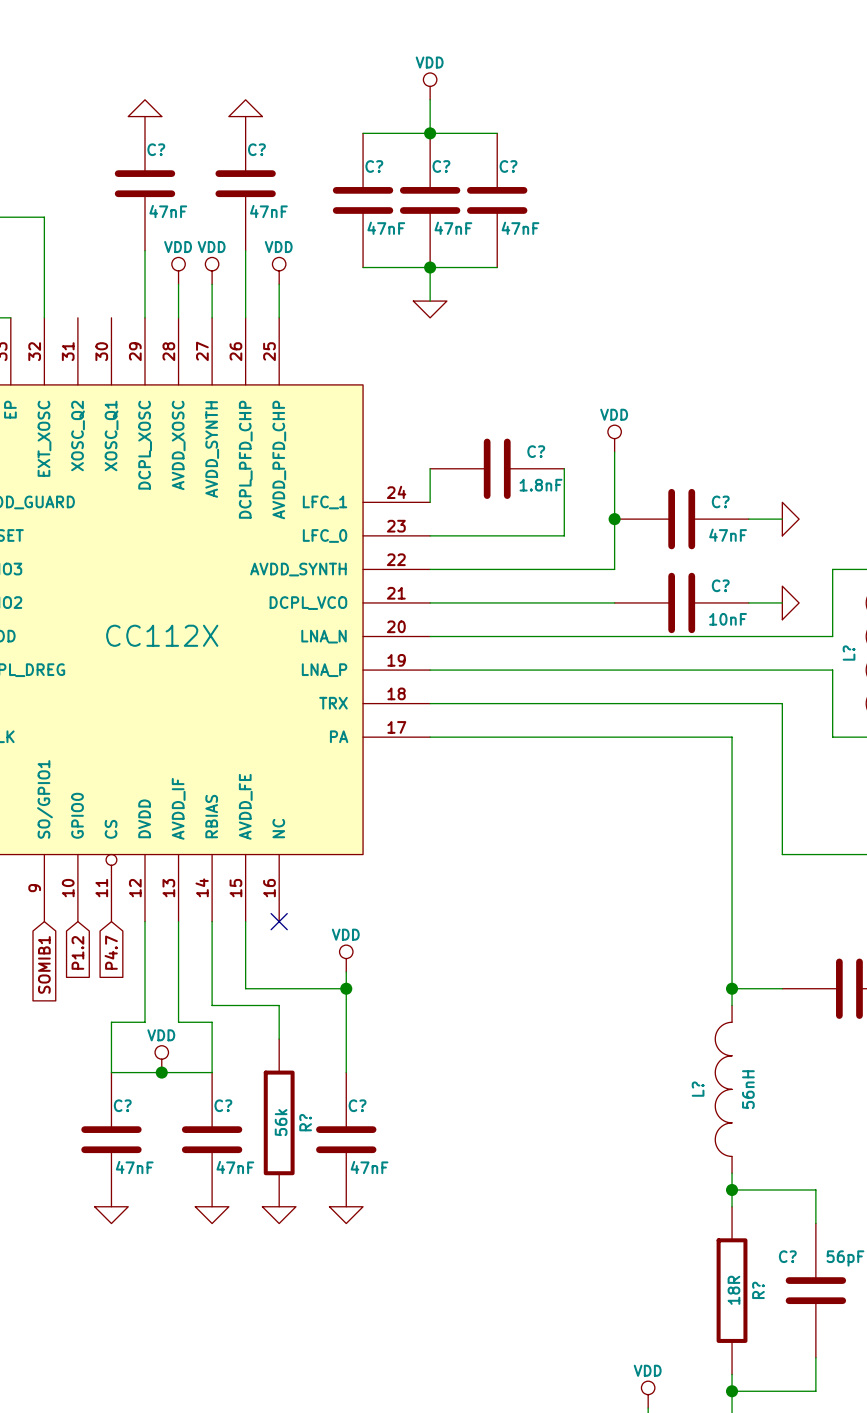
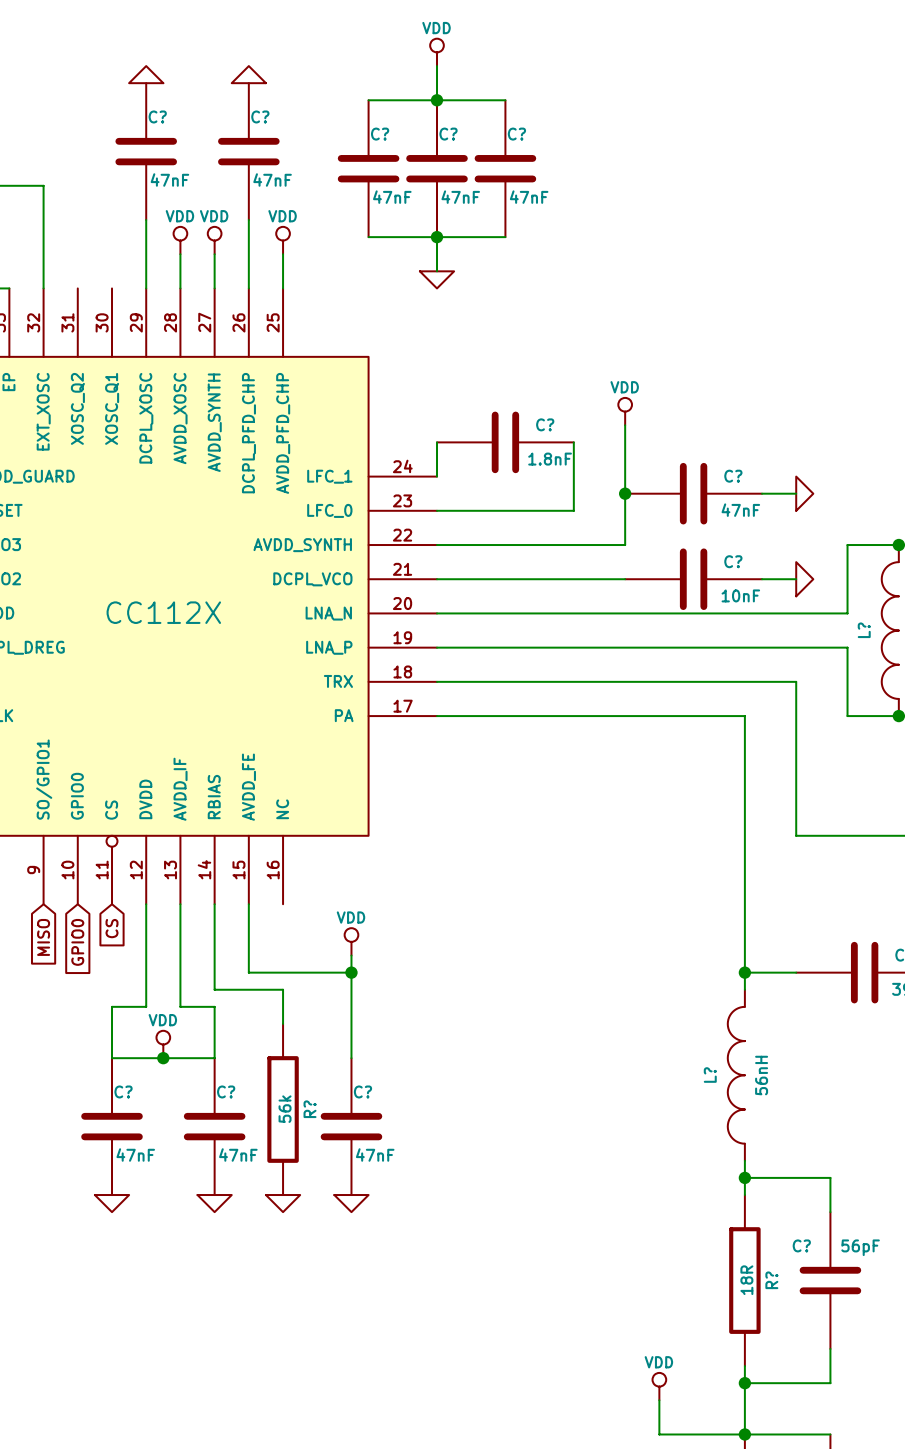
no-connect mark: (279, 921) -> none
global label: P1.2 (77, 952) -> GPIO0 (77, 942)
global label: P4.7 (111, 952) -> CS (112, 928)
global label: SOMIB1 (44, 964) -> MISO (43, 937)

